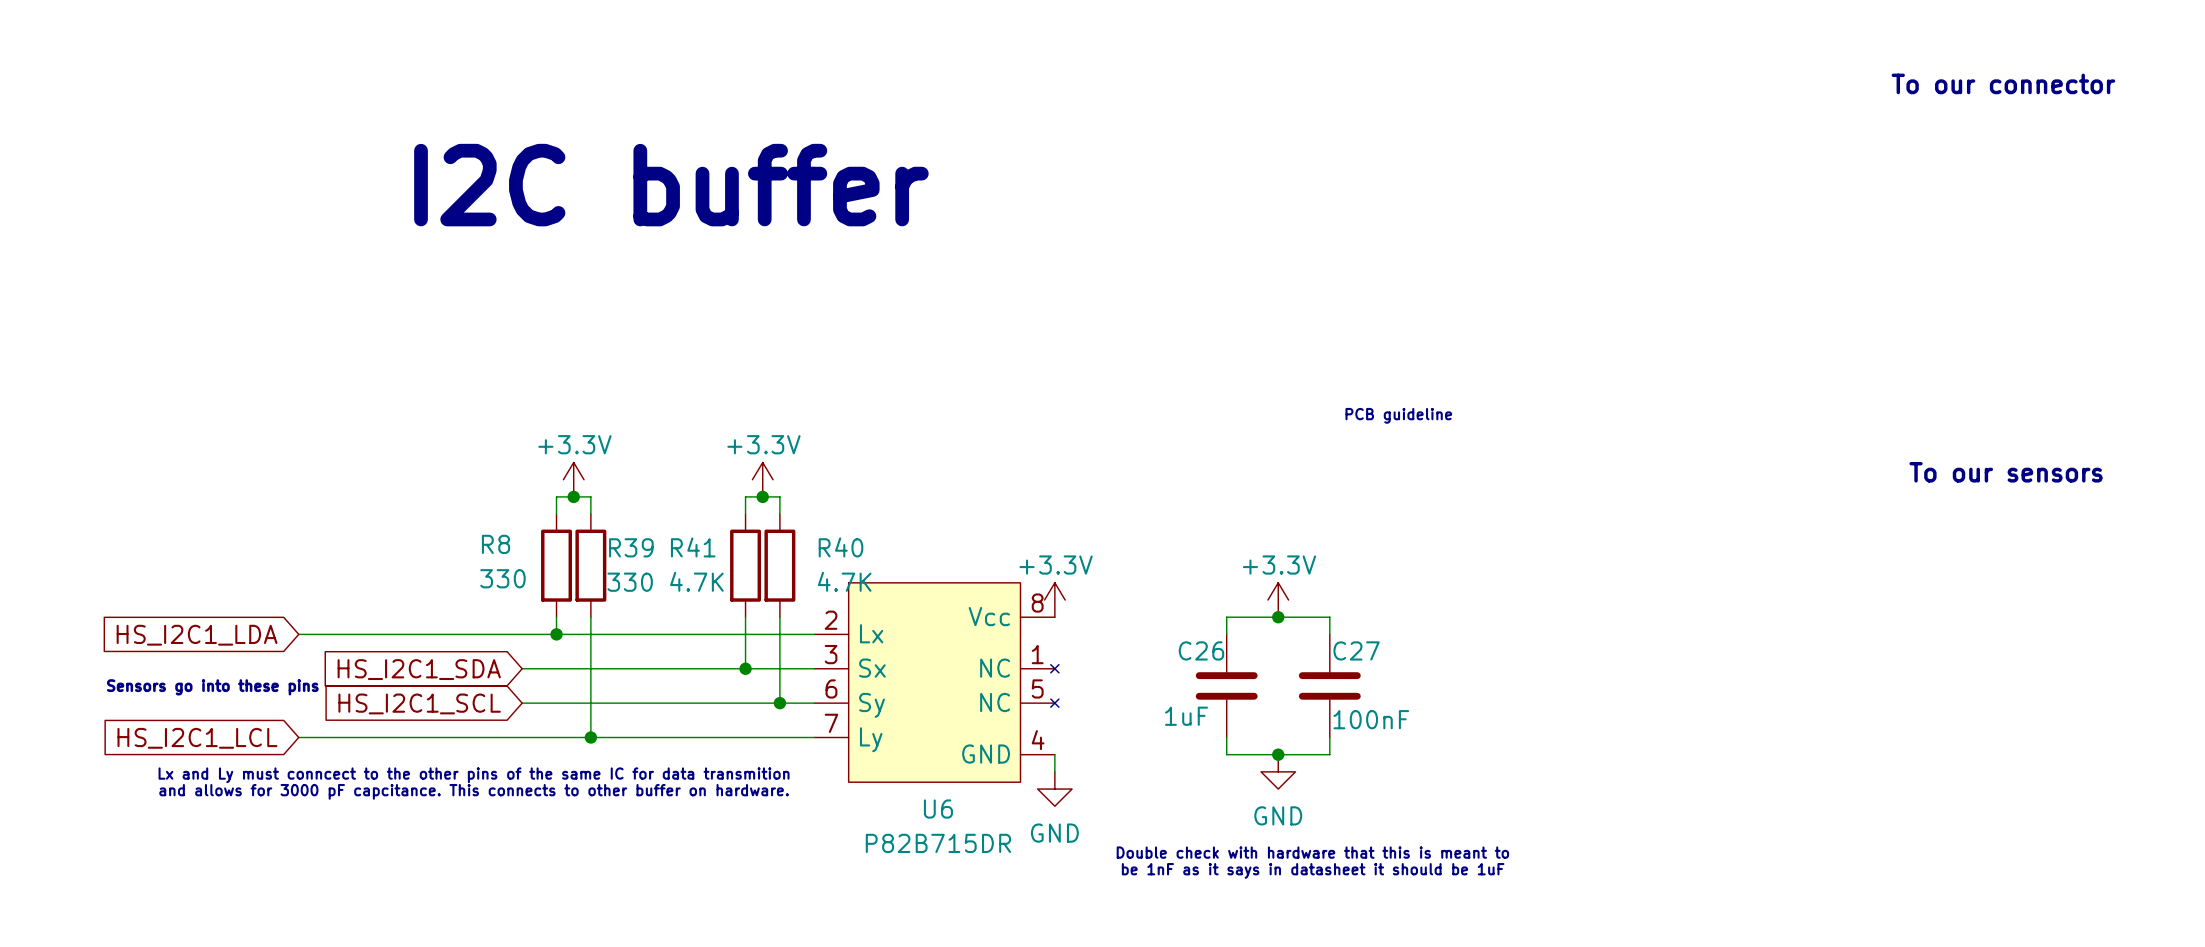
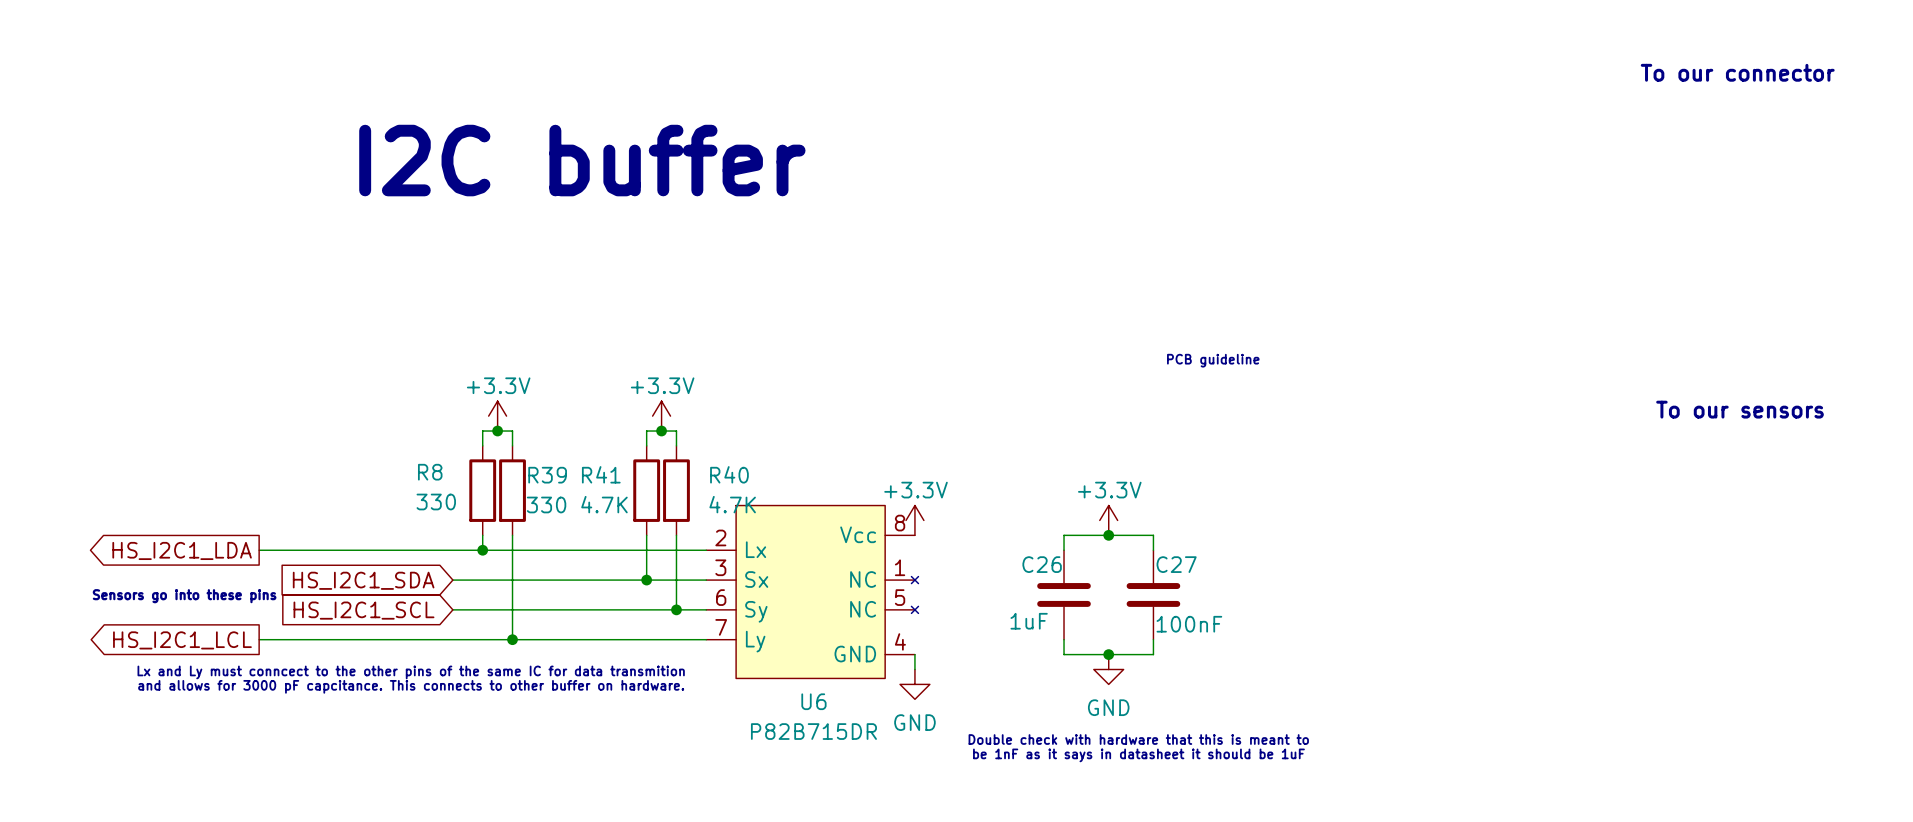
global label shape: input (197, 635) -> output (182, 550)
global label shape: input (197, 738) -> output (182, 640)

